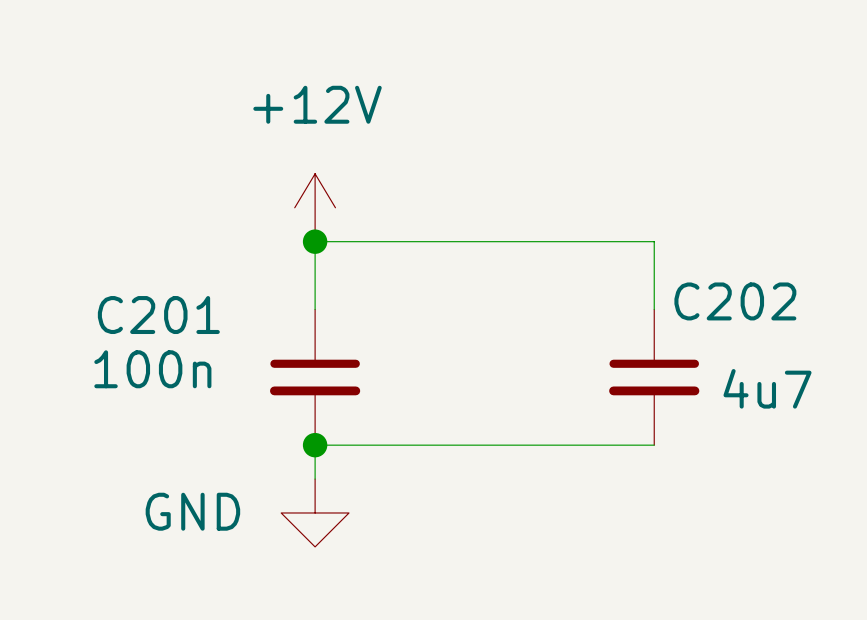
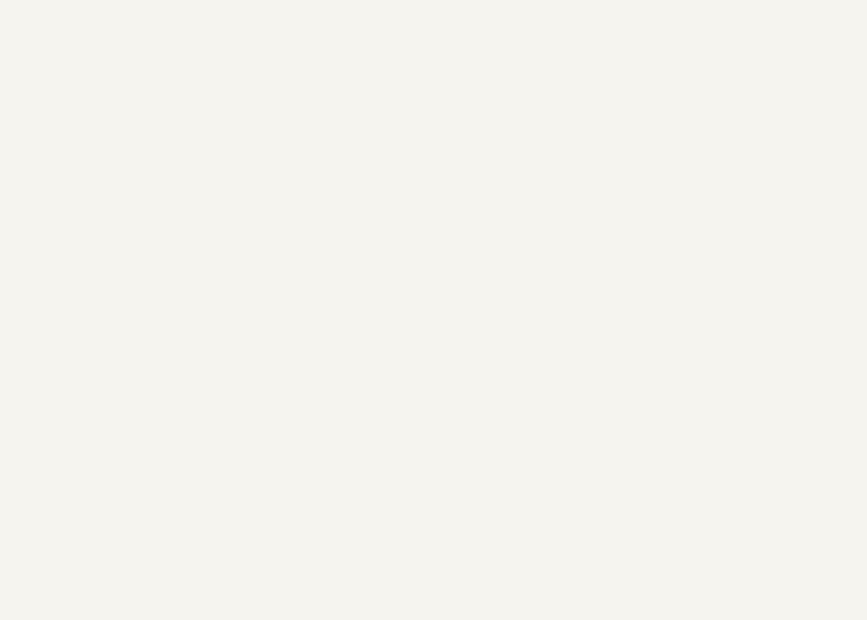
power symbol: +12V (315, 207) -> none
junction: (315, 241) -> none
wire: (315, 309) (315, 241) (654, 241) (654, 309) -> none
C201: 100n (315, 377) -> none
C202: 4u7 (654, 377) -> none
junction: (315, 445) -> none
wire: (654, 445) (315, 445) (315, 479) -> none
power symbol: GND (315, 512) -> none

